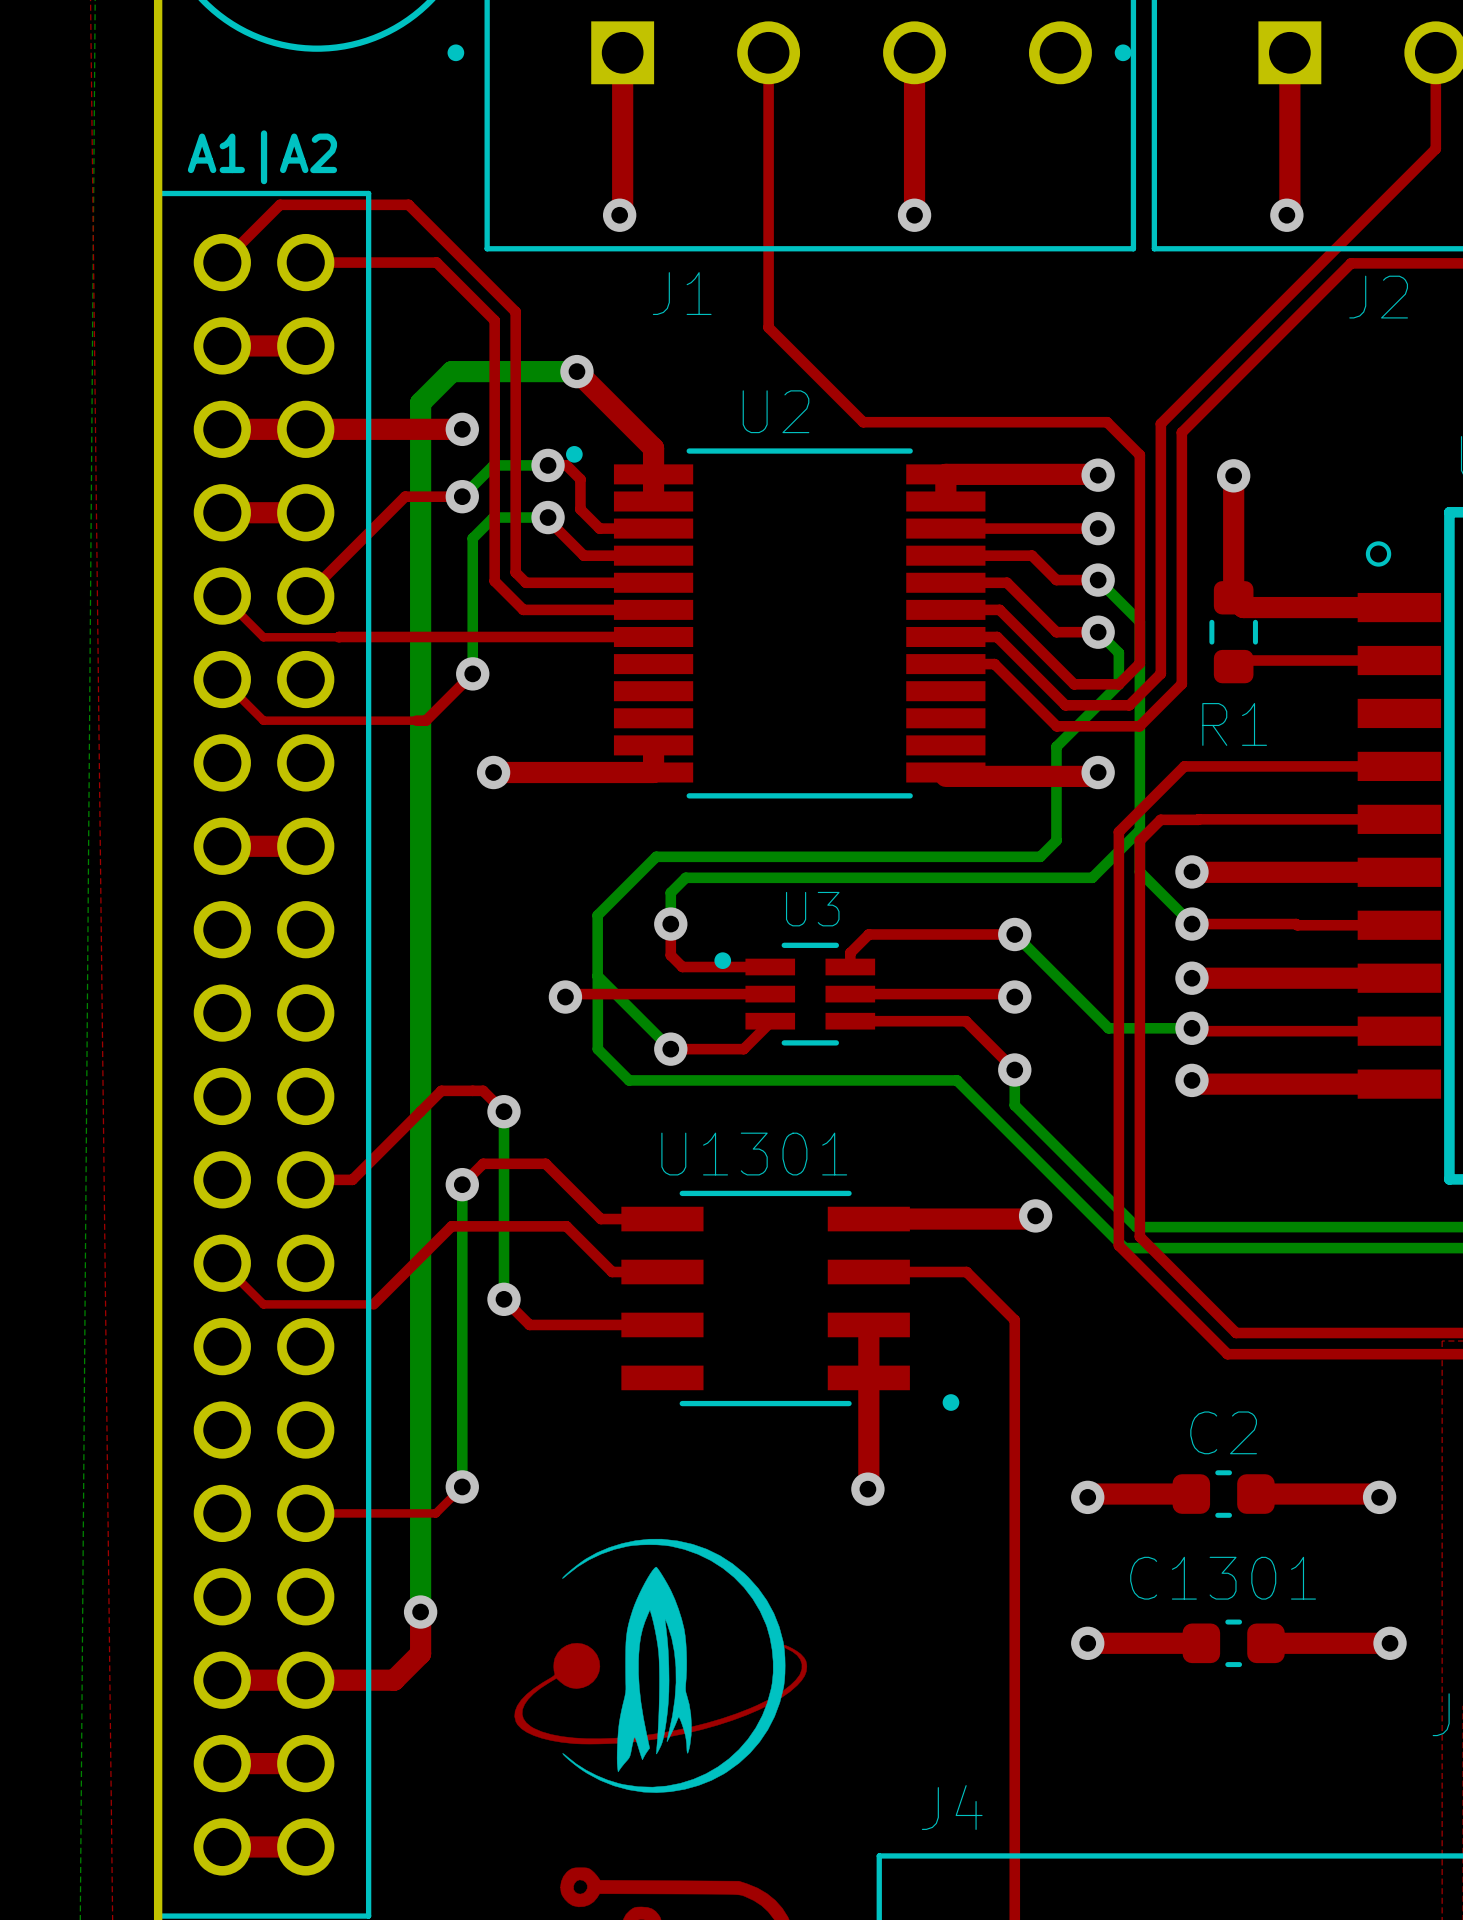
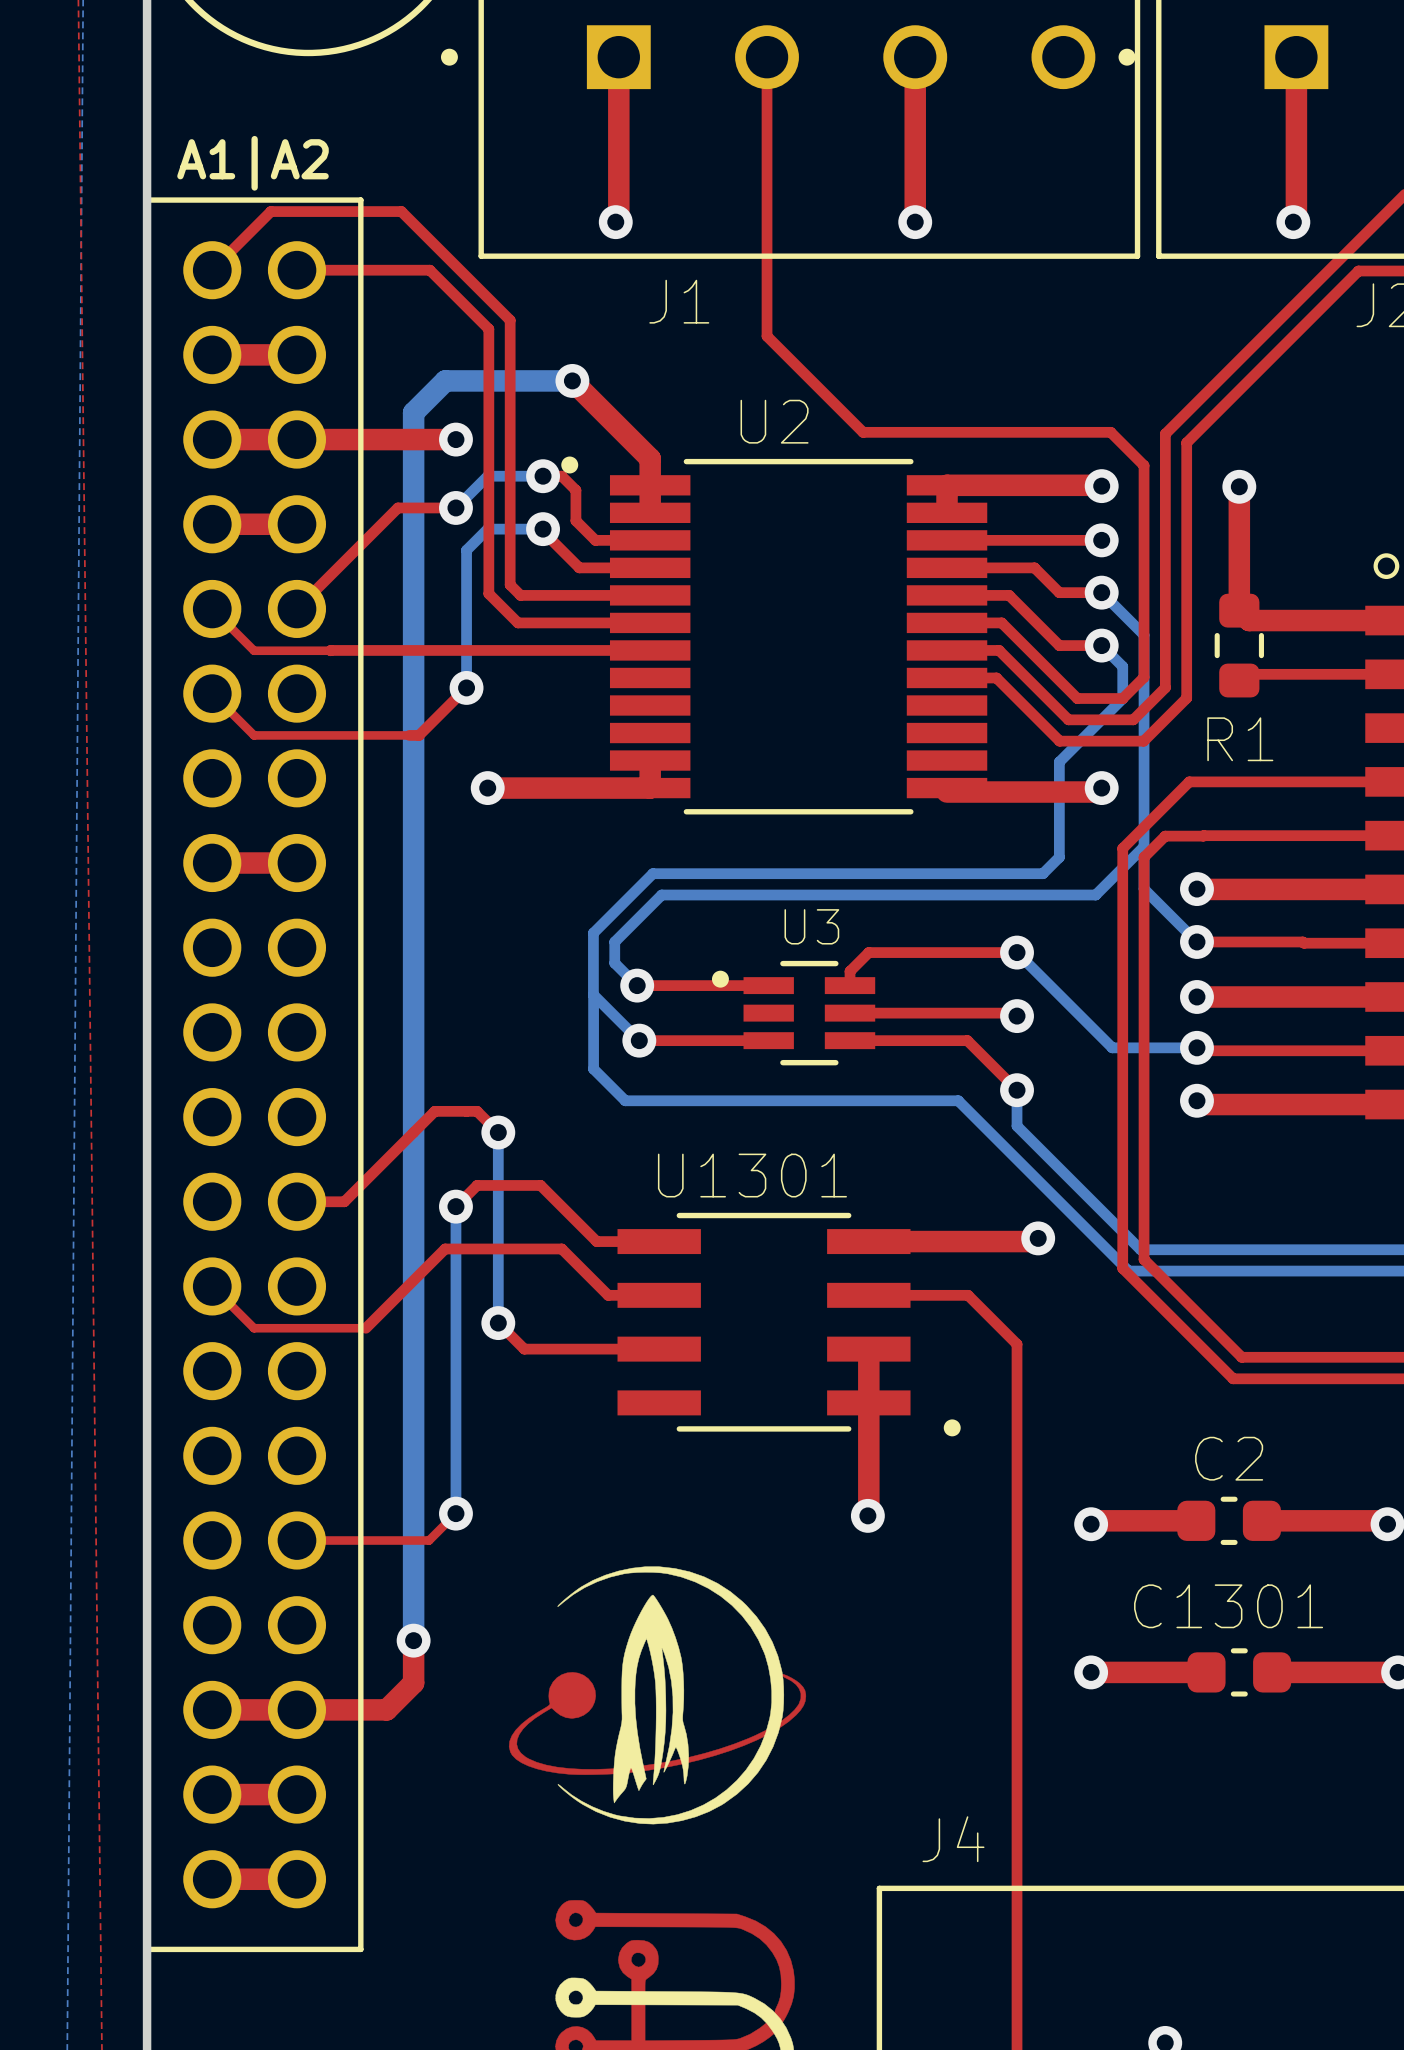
bottom track: (685, 877) (670, 892) (670, 924) -> (682, 895) (661, 895) (614, 941) (614, 963) (637, 985)
top track: (670, 924) (670, 955) (682, 967) -> (637, 985) (679, 985)
via: (670, 924) -> none
via: none -> (637, 985)
top track: (770, 994) (568, 994) (565, 997) -> none
via: (565, 997) -> none
bottom track: (642, 1021) (670, 1049) -> none
top track: (770, 1021) (743, 1049) (670, 1049) -> (768, 1040) (639, 1040)
via position: (670, 1049) -> (639, 1040)

